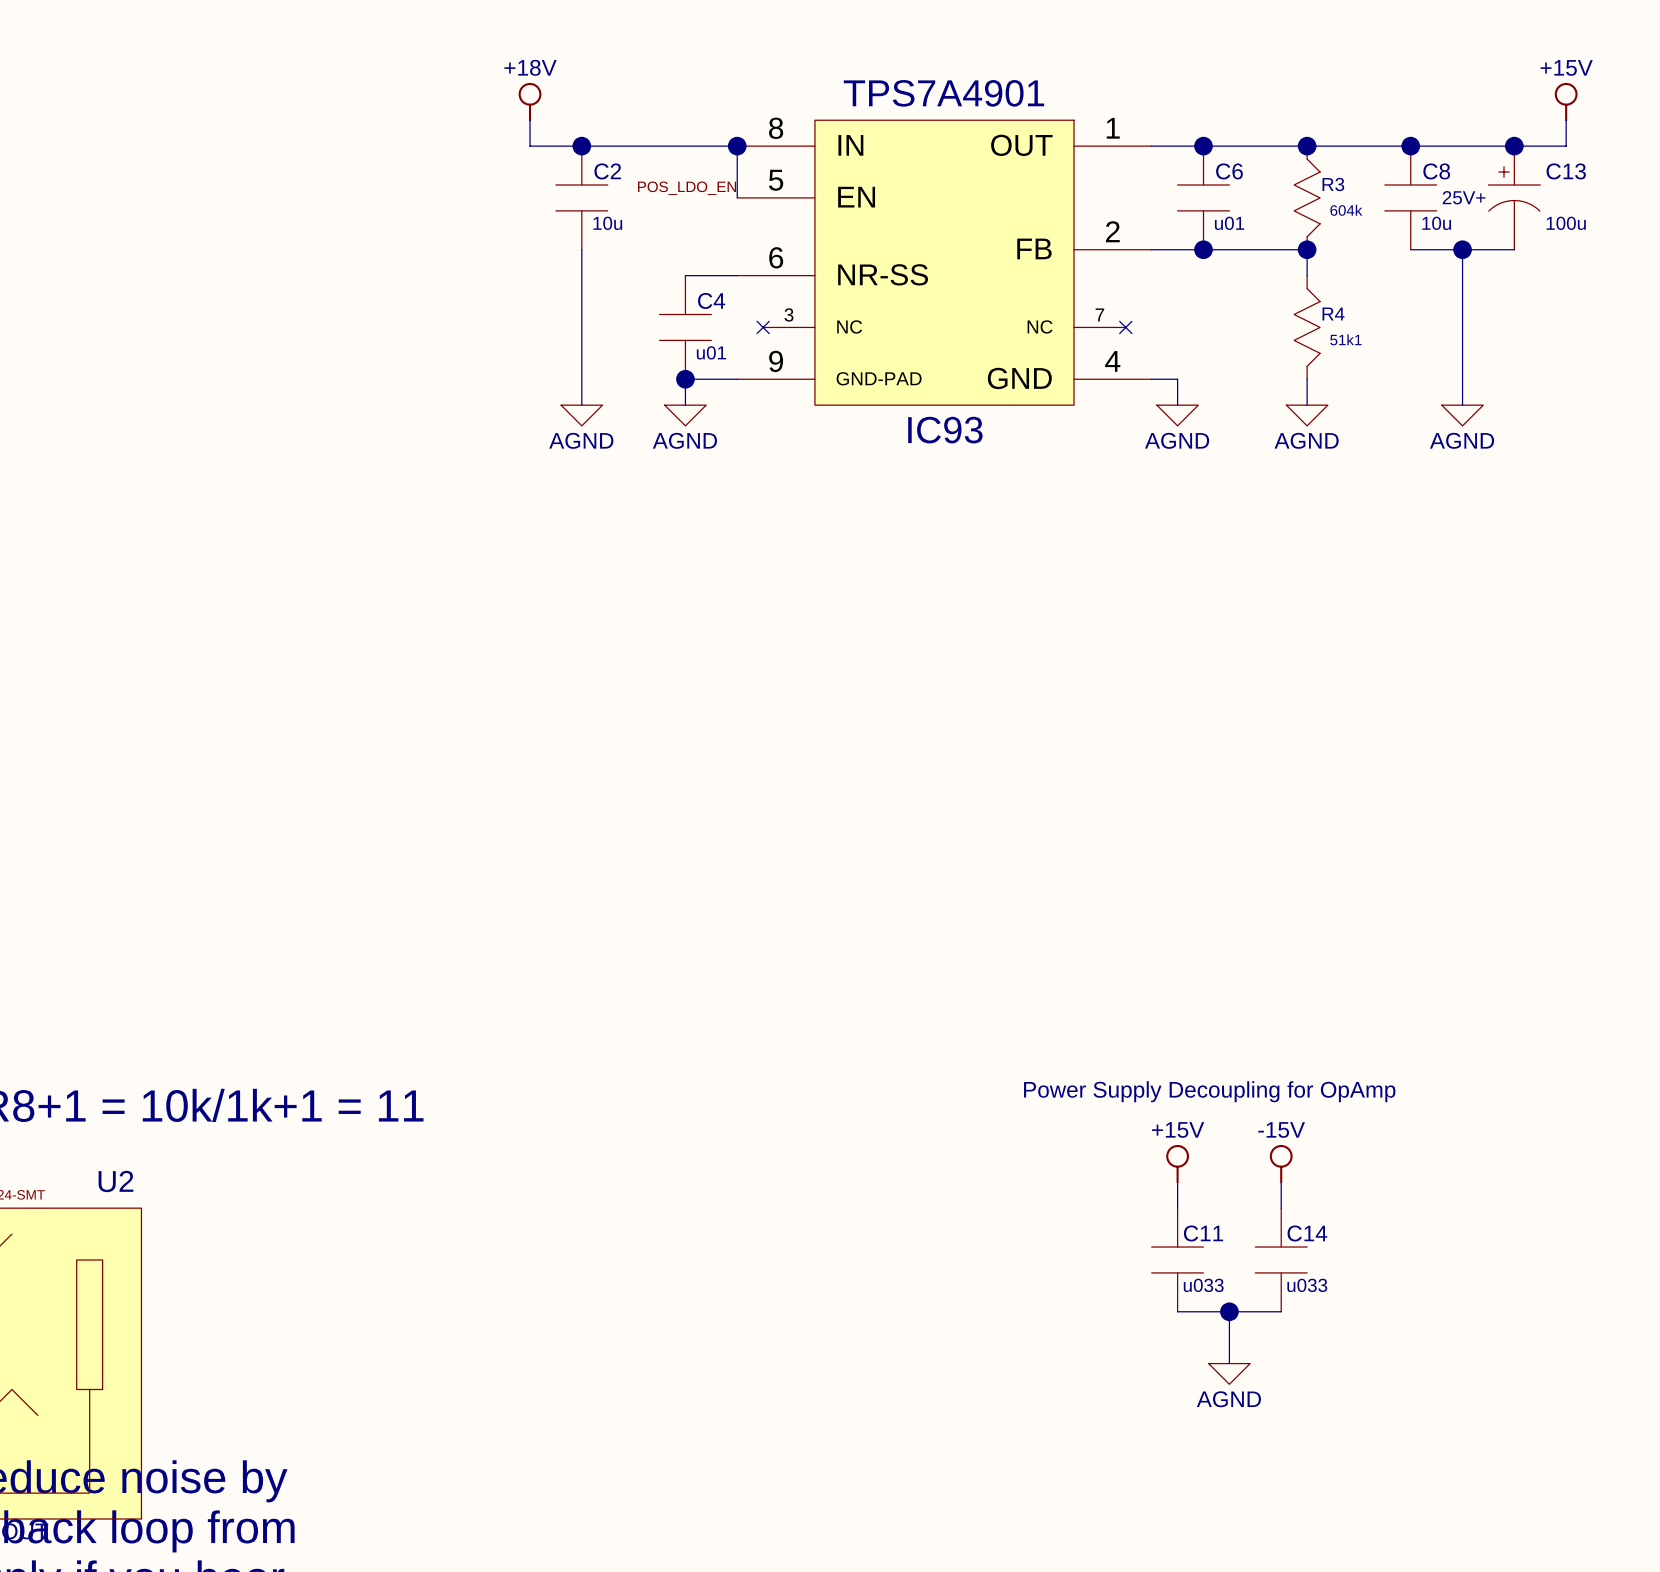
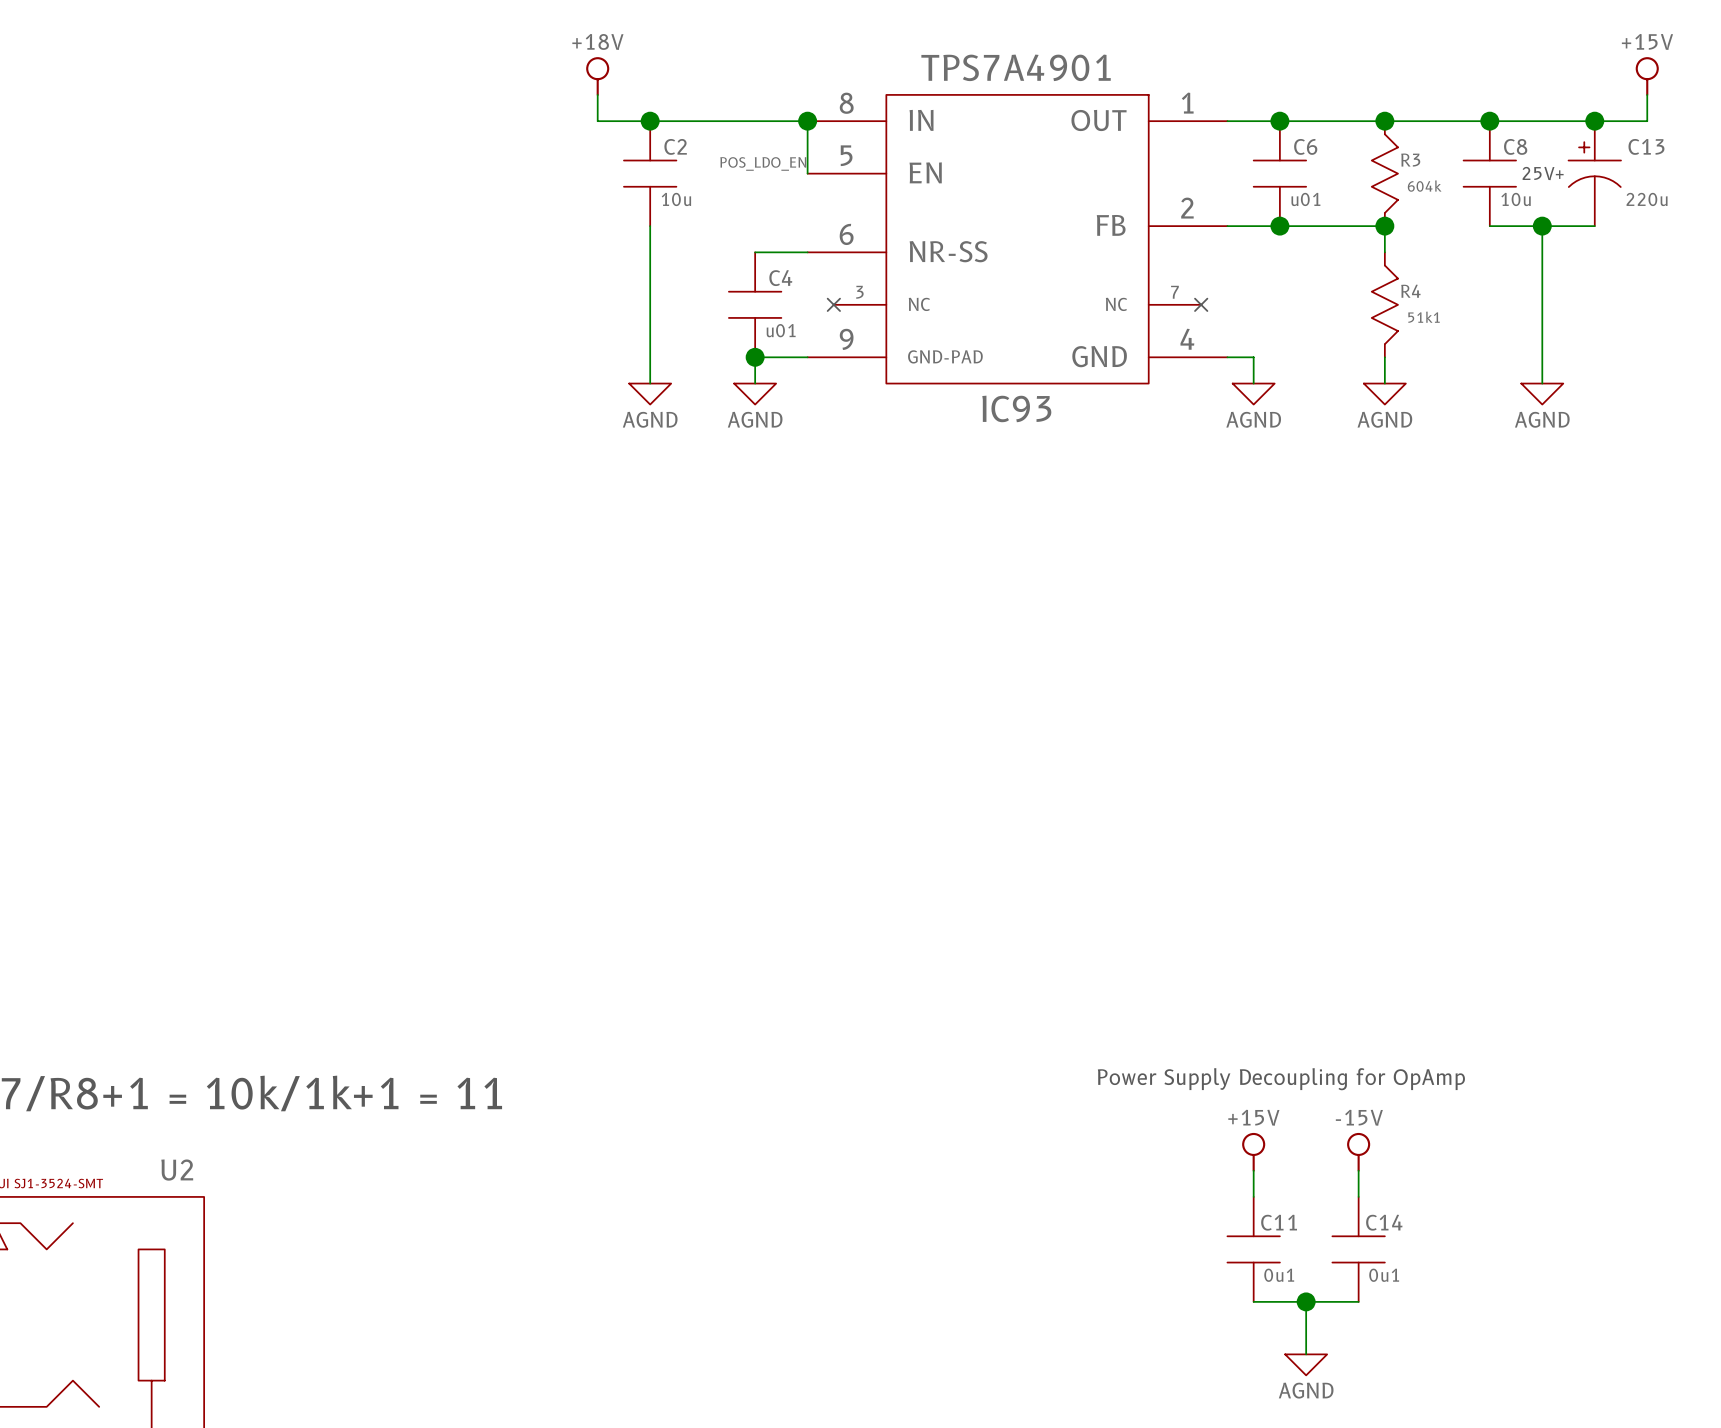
C13 value: 100u (1566, 223) -> 220u (1647, 199)
C11 value: u033 (1203, 1285) -> 0u1 (1279, 1275)
C14 value: u033 (1307, 1285) -> 0u1 (1384, 1275)

